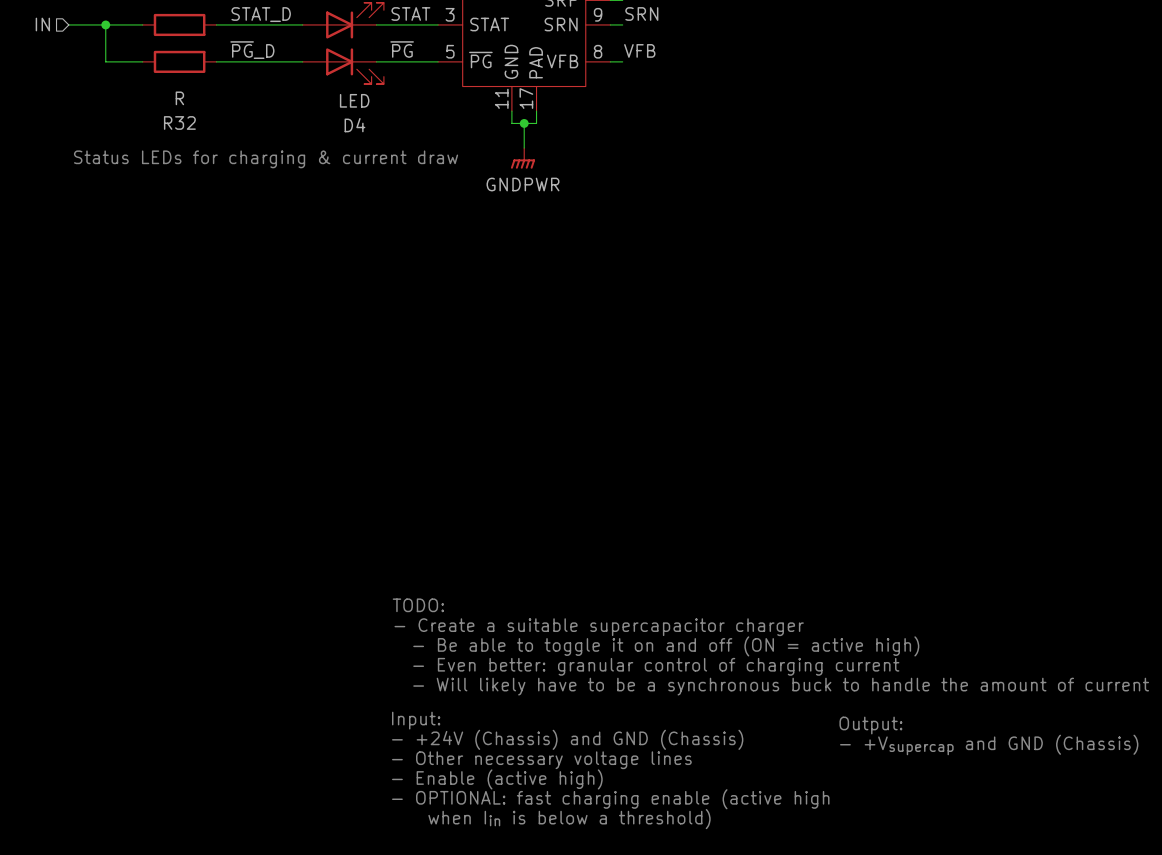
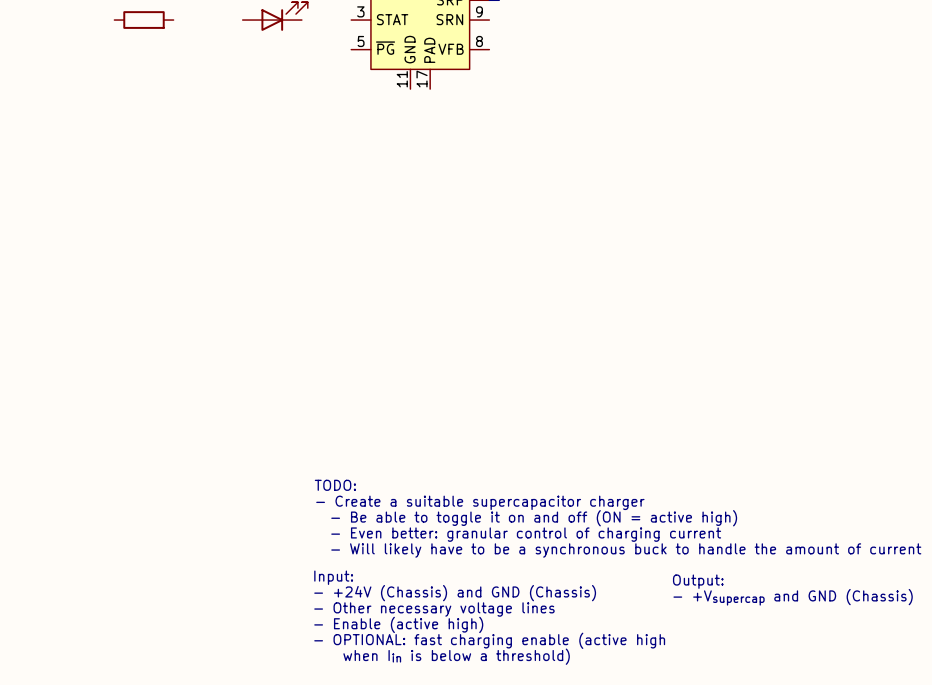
label: STAT (410, 13) -> none
label: SRN (641, 13) -> none
label: STAT_D (261, 14) -> none
hierarchical label: IN (42, 24) -> none
wire: (68, 24) (142, 24) -> none
wire: (105, 24) (105, 61) (142, 61) -> none
junction: (105, 24) -> none
wire: (216, 24) (302, 24) -> none
wire: (376, 24) (438, 24) -> none
wire: (610, 24) (622, 24) -> none
label: ~{PG} (402, 49) -> none
label: ~{PG}_D (252, 50) -> none
label: VFB (639, 50) -> none
R32: R (179, 61) -> none
wire: (216, 61) (302, 61) -> none
wire: (376, 61) (438, 61) -> none
wire: (610, 61) (622, 61) -> none
D4: LED (343, 66) -> none
wire: (511, 111) (511, 123) (536, 123) (536, 111) -> none
wire: (524, 123) (524, 148) -> none
junction: (524, 123) -> none
power symbol: GNDPWR (522, 158) -> none
text: Status LEDs for charging & current draw (266, 159) -> none

